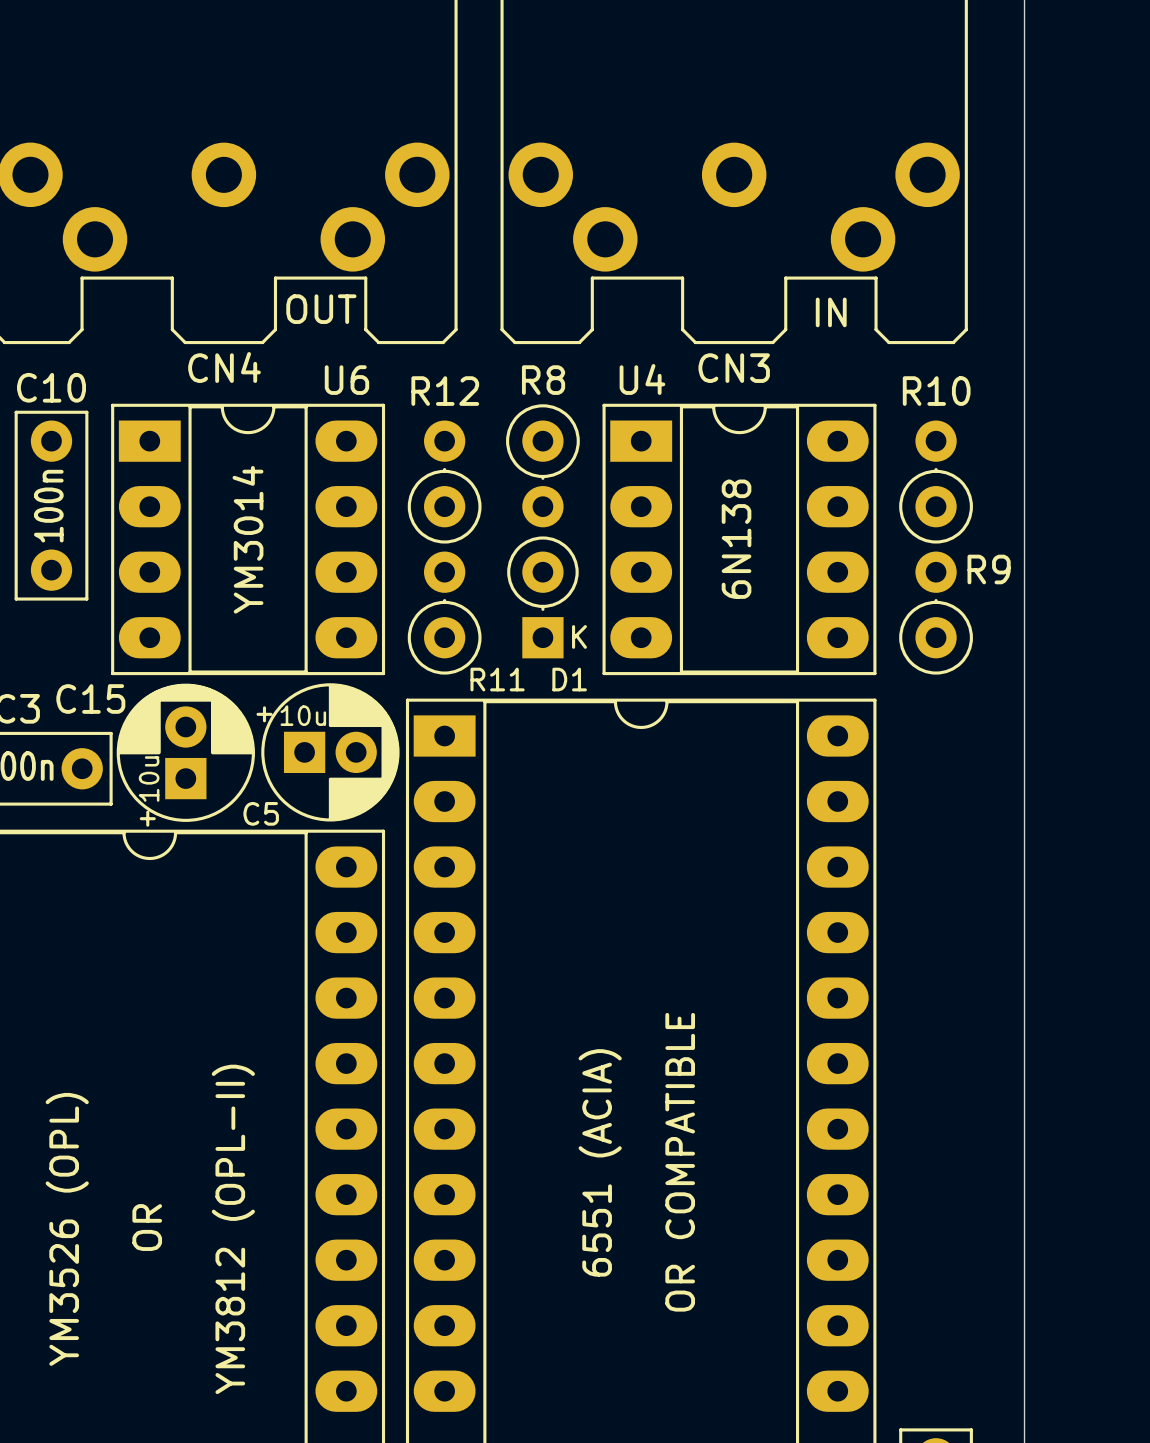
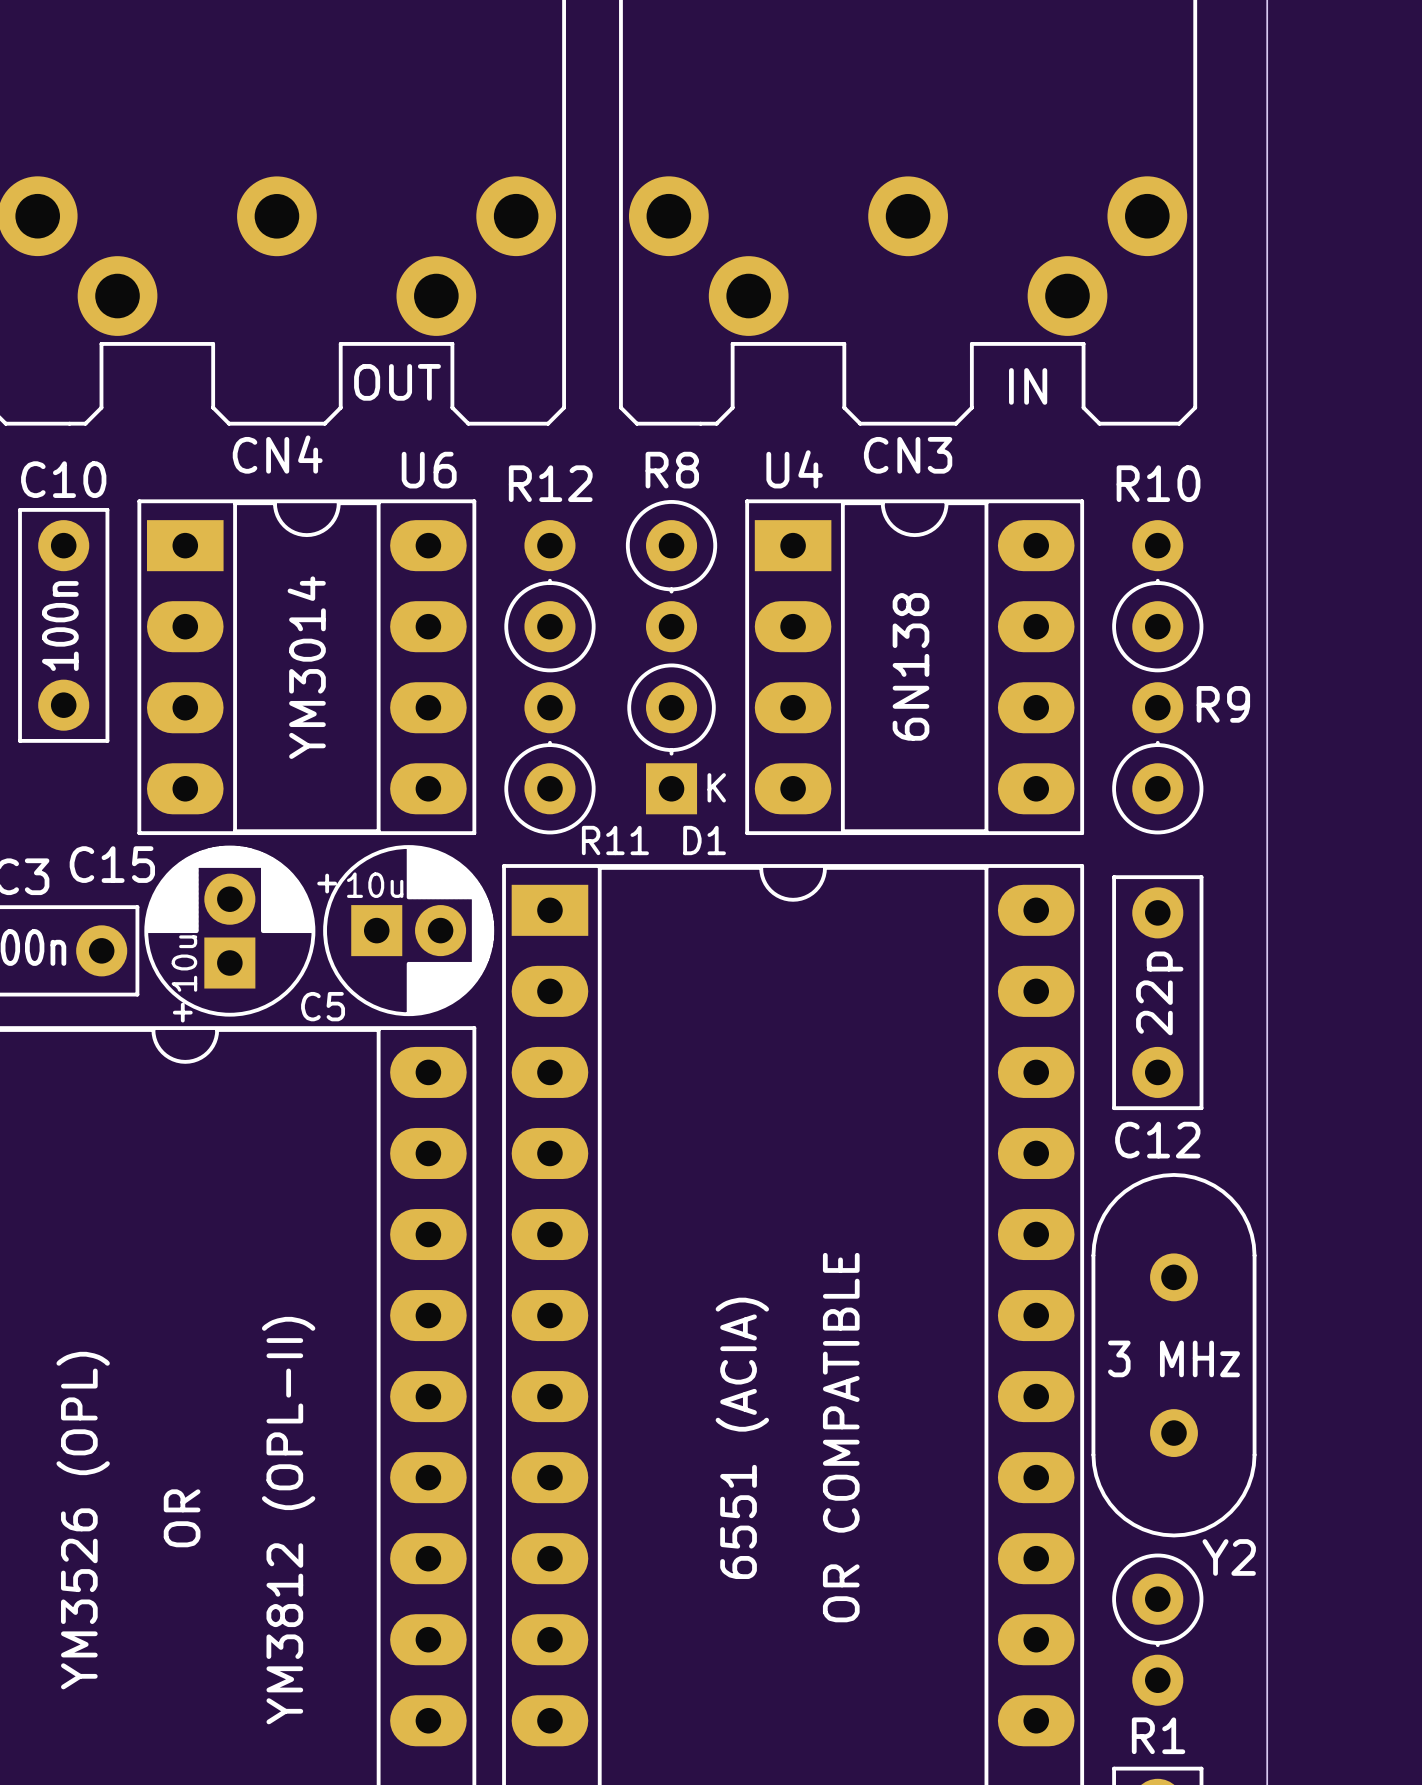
C12: none -> 22p (1157, 992)
Y2: none -> (1173, 1355)
text: none -> 3 MHz (1173, 1358)
R1: none -> (1157, 1629)

